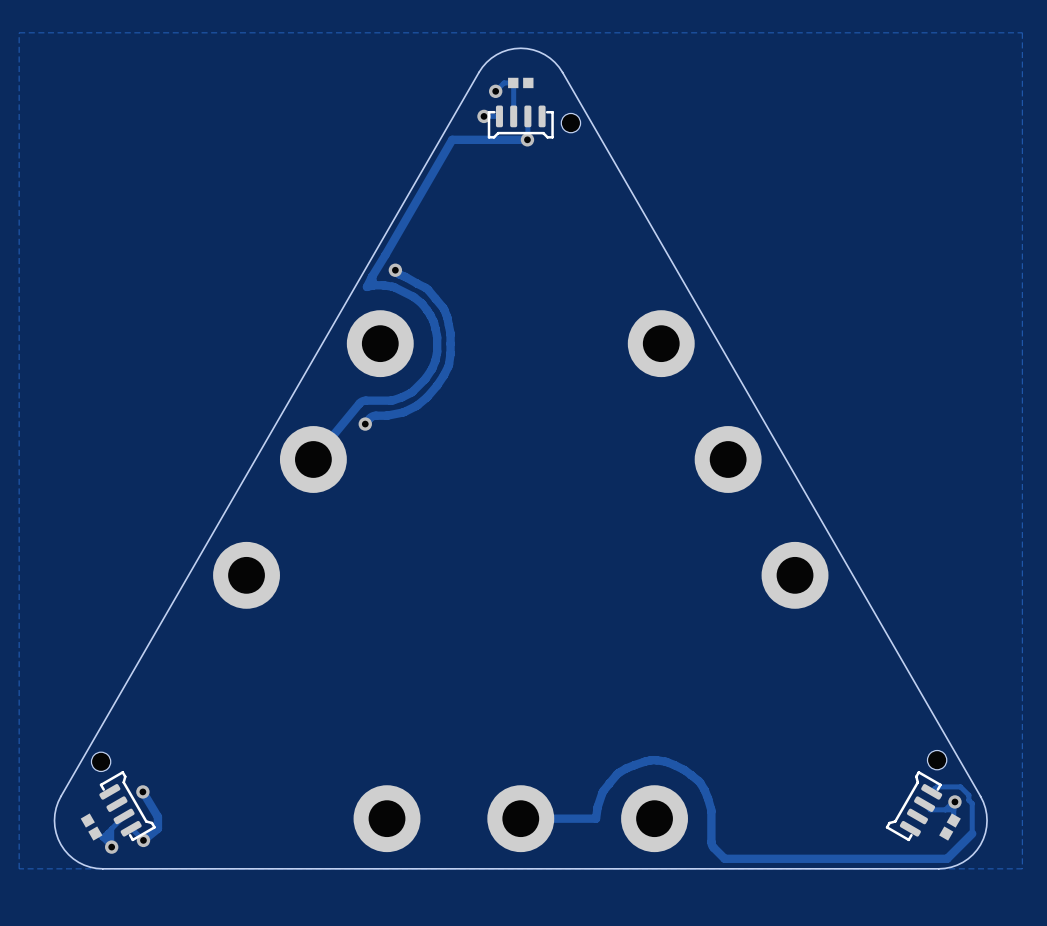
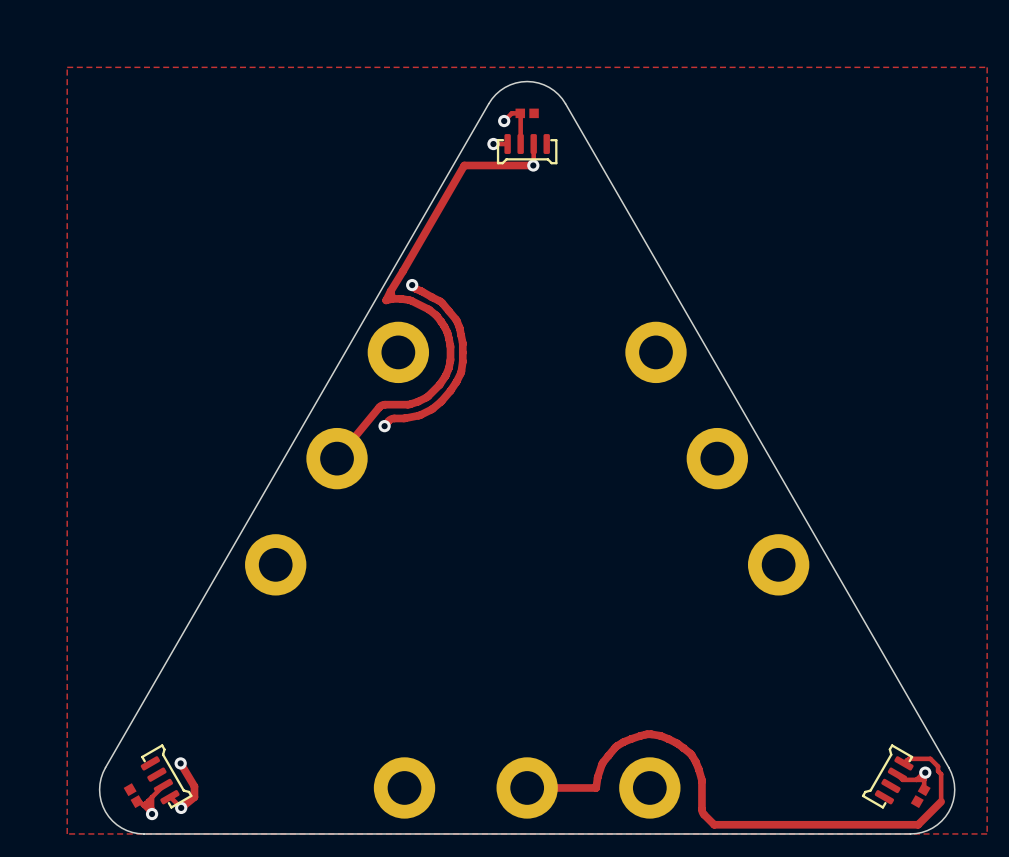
part: (570, 123) -> none
part: (937, 760) -> none
part: (101, 761) -> none

